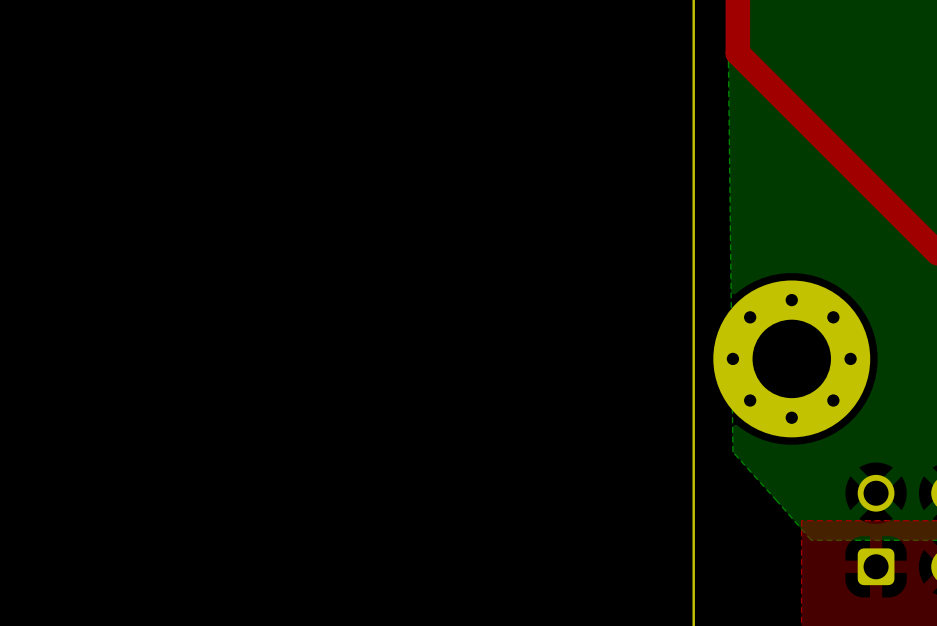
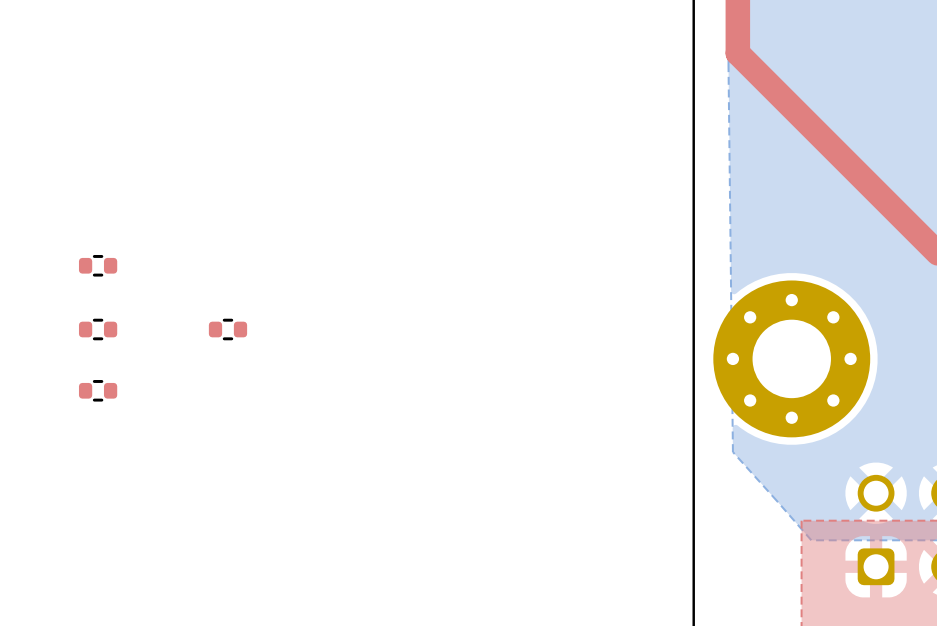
part: none -> (98, 265)
part: none -> (98, 329)
part: none -> (227, 329)
part: none -> (98, 390)

